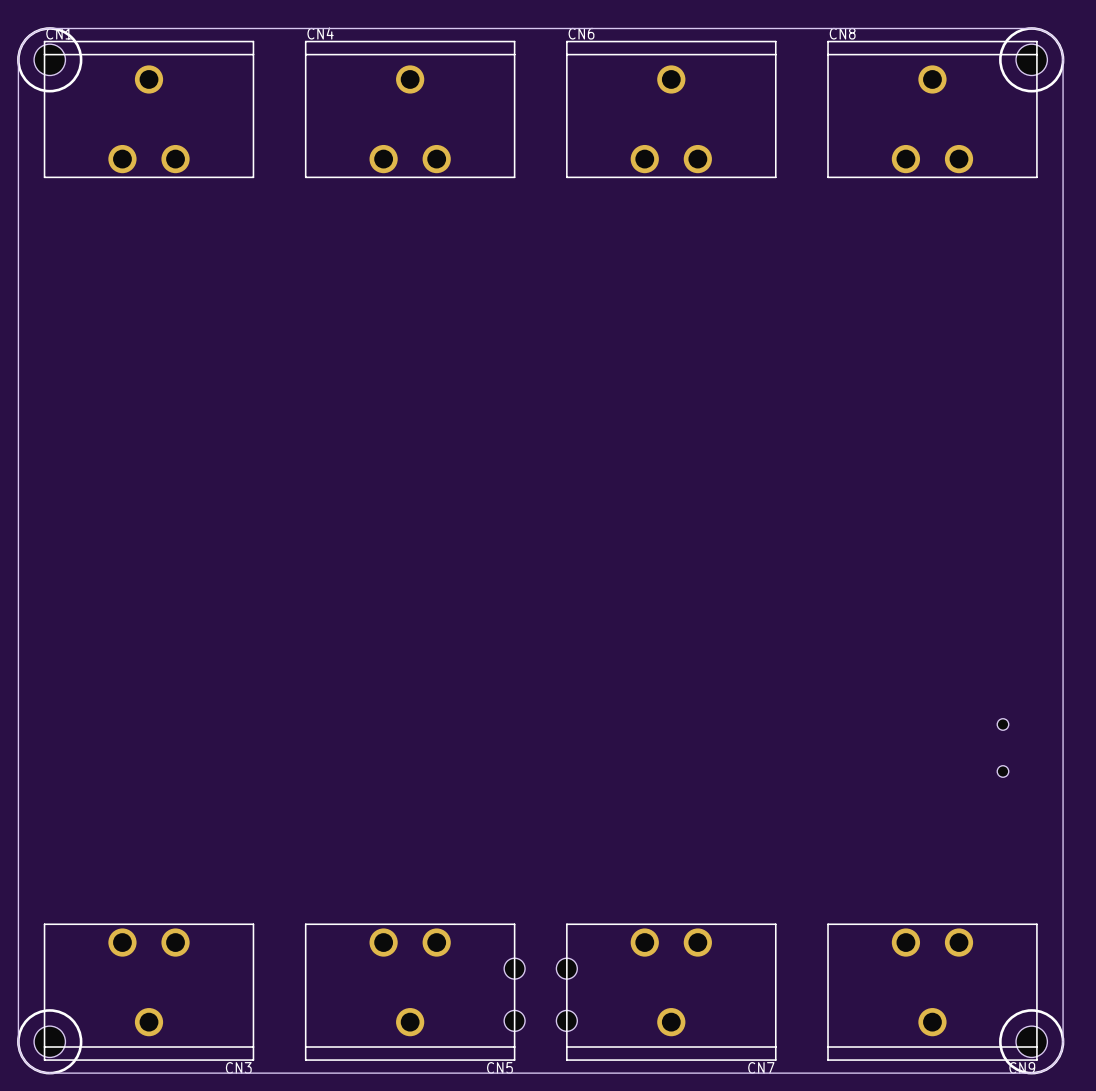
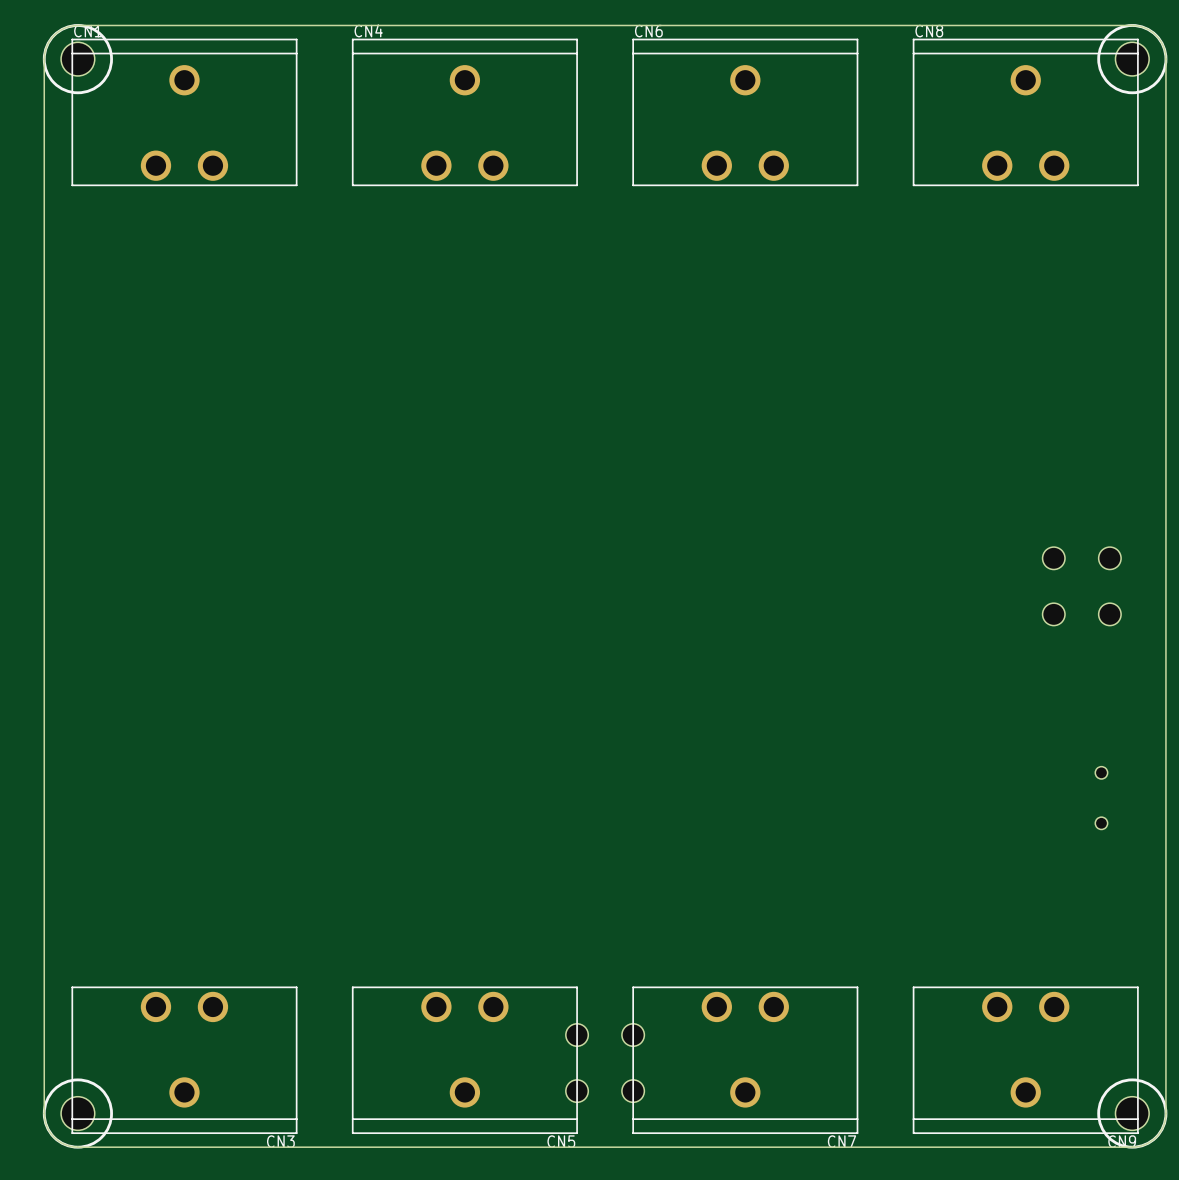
hole: none -> (1053, 558)
hole: none -> (1109, 558)
hole: none -> (1053, 614)
hole: none -> (1109, 614)

